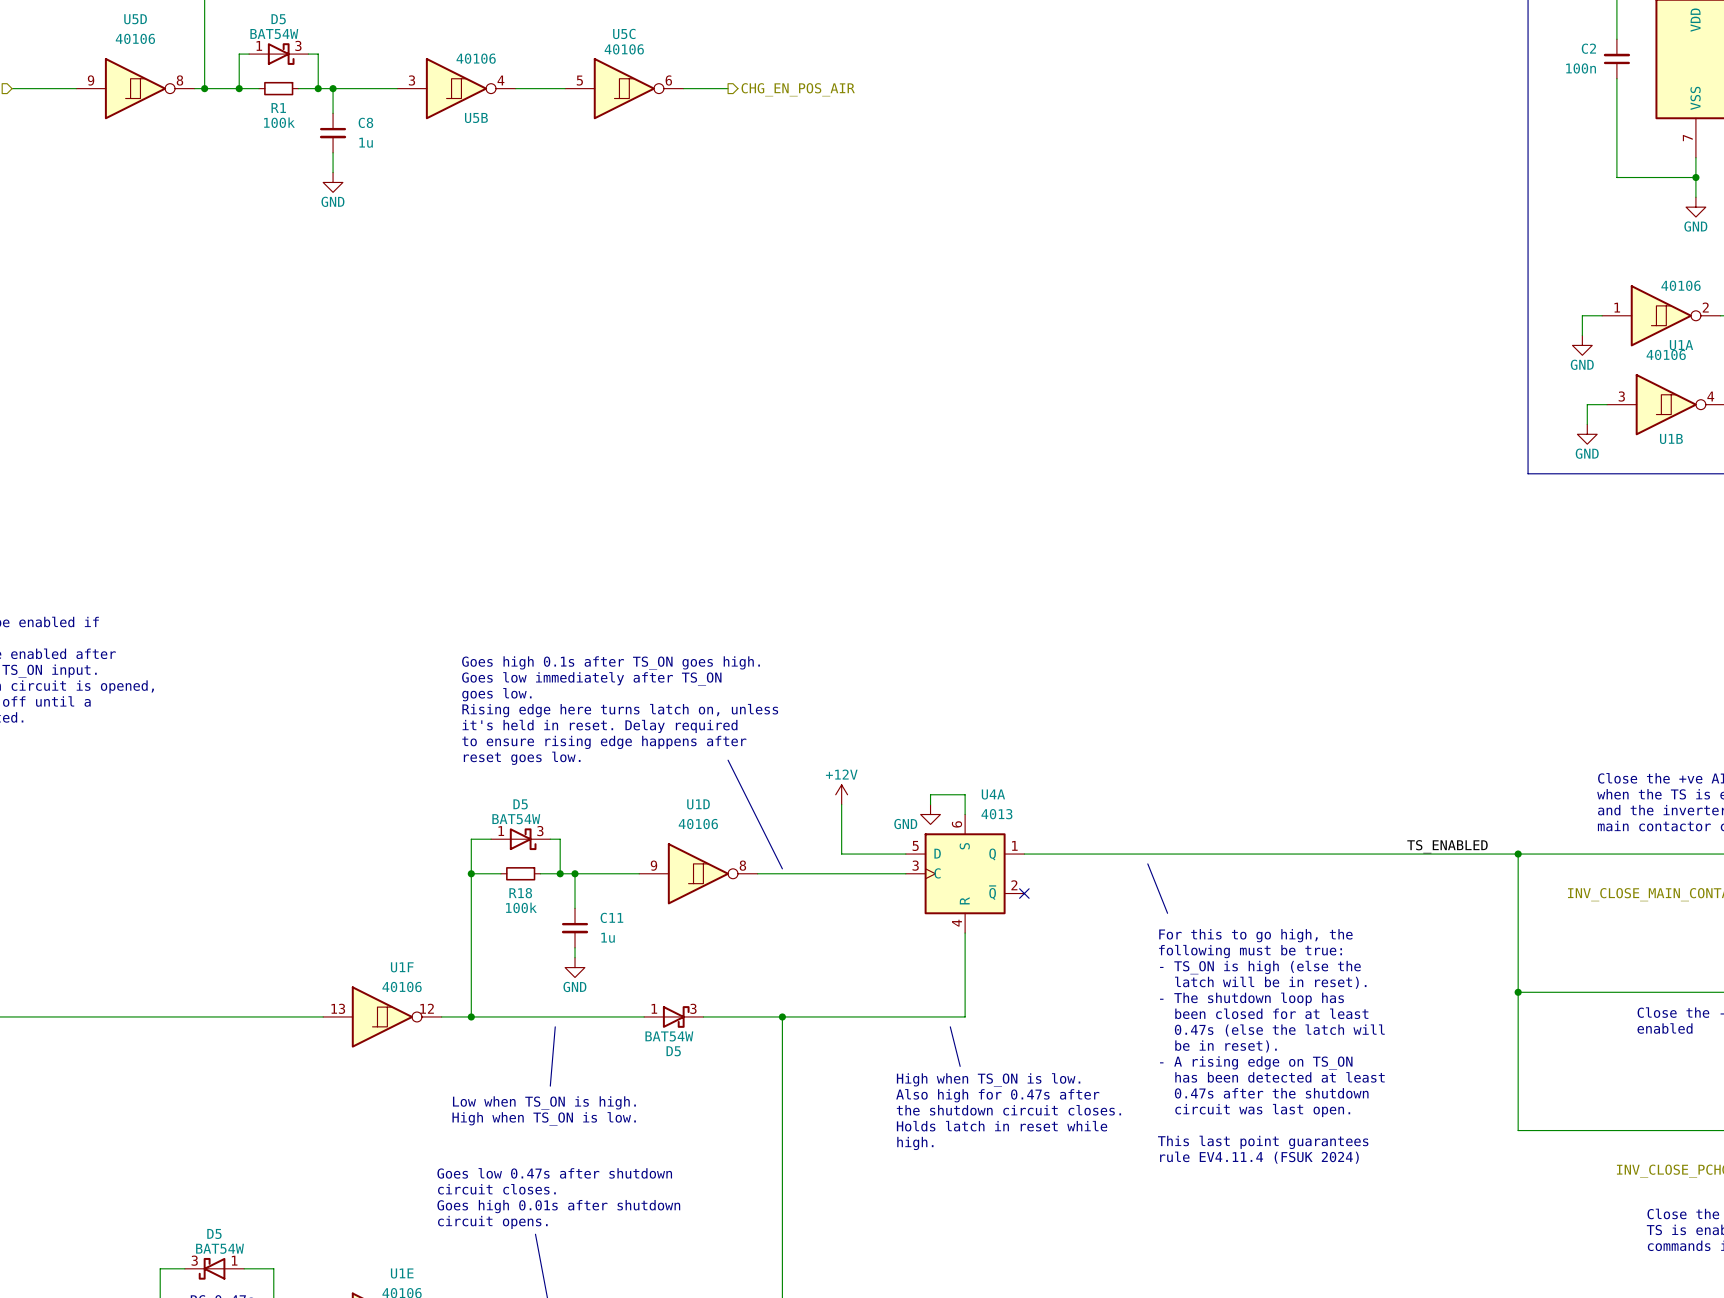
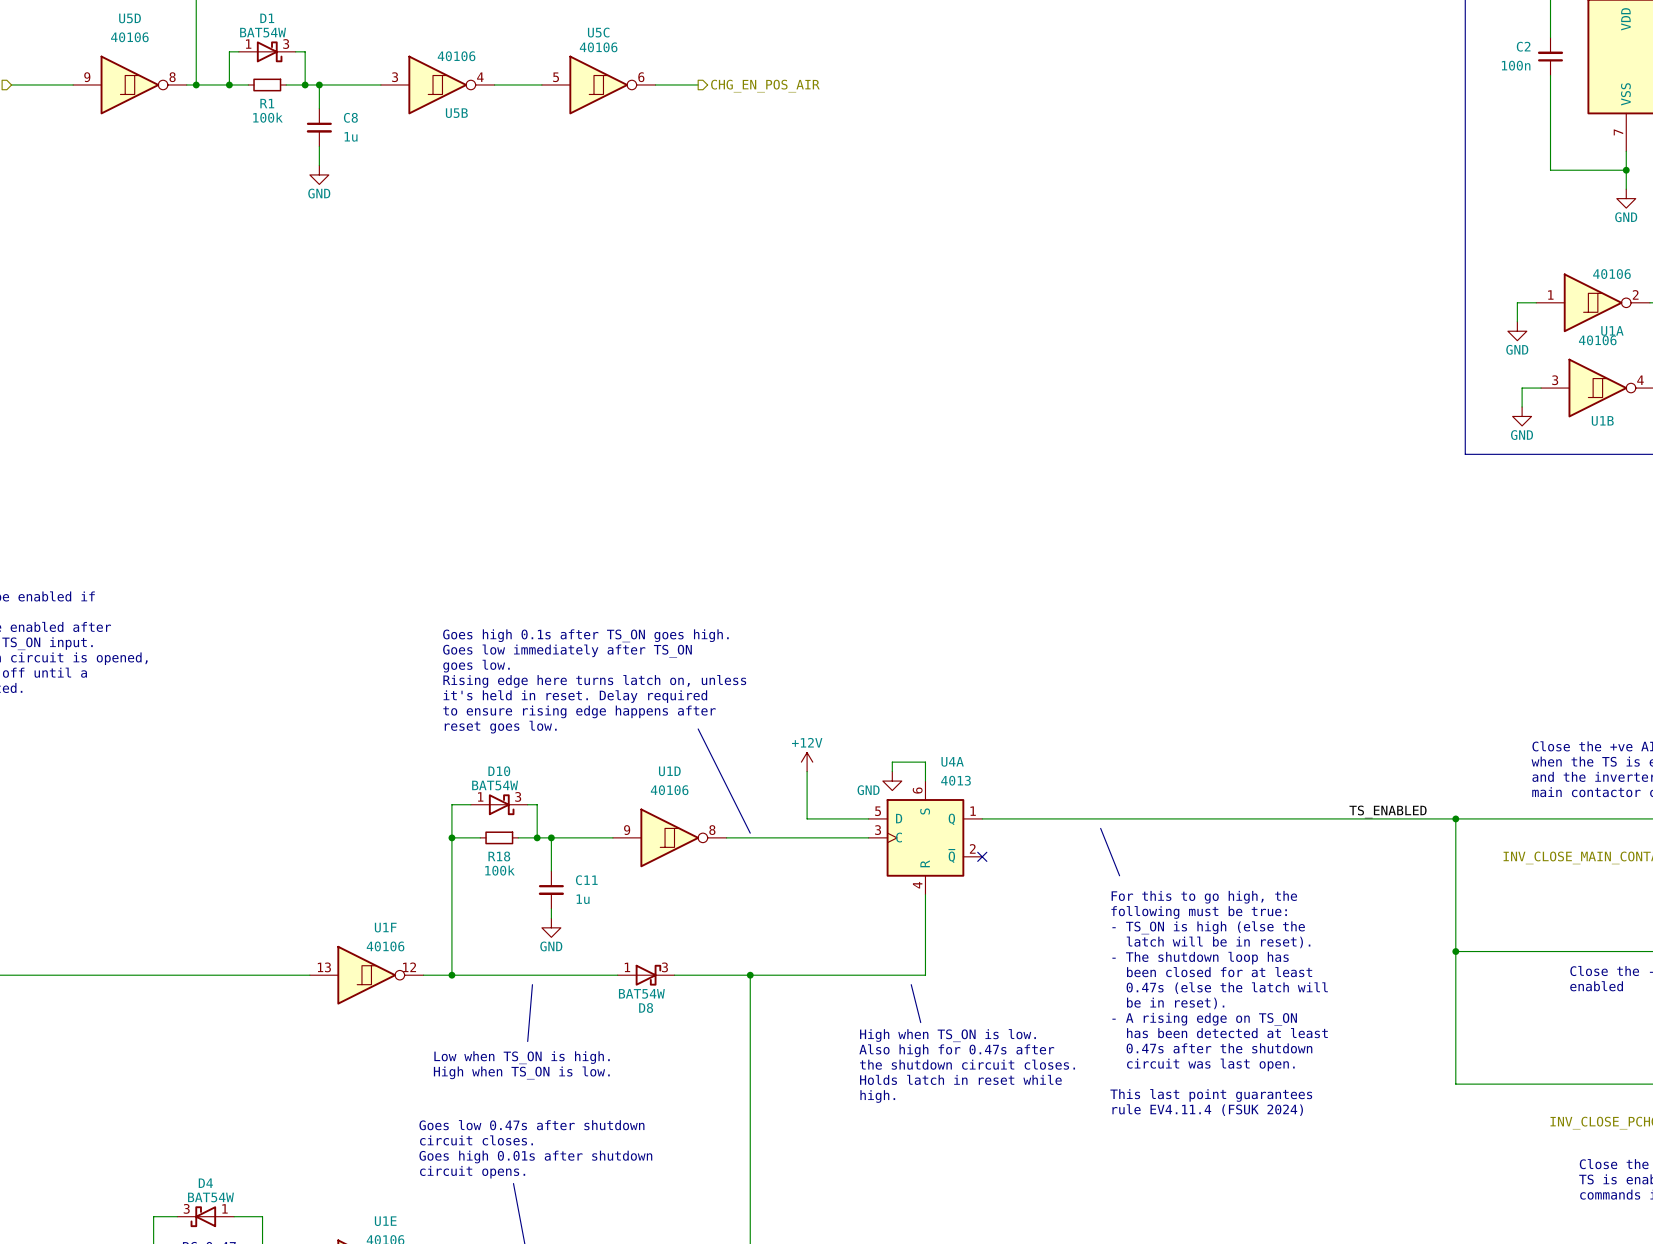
D5 name: D5 (278, 19) -> D1 (267, 18)
D5 name: D5 (520, 804) -> D10 (499, 771)
D5 name: D5 (673, 1051) -> D8 (646, 1008)
D5 name: D5 (214, 1233) -> D4 (205, 1183)

